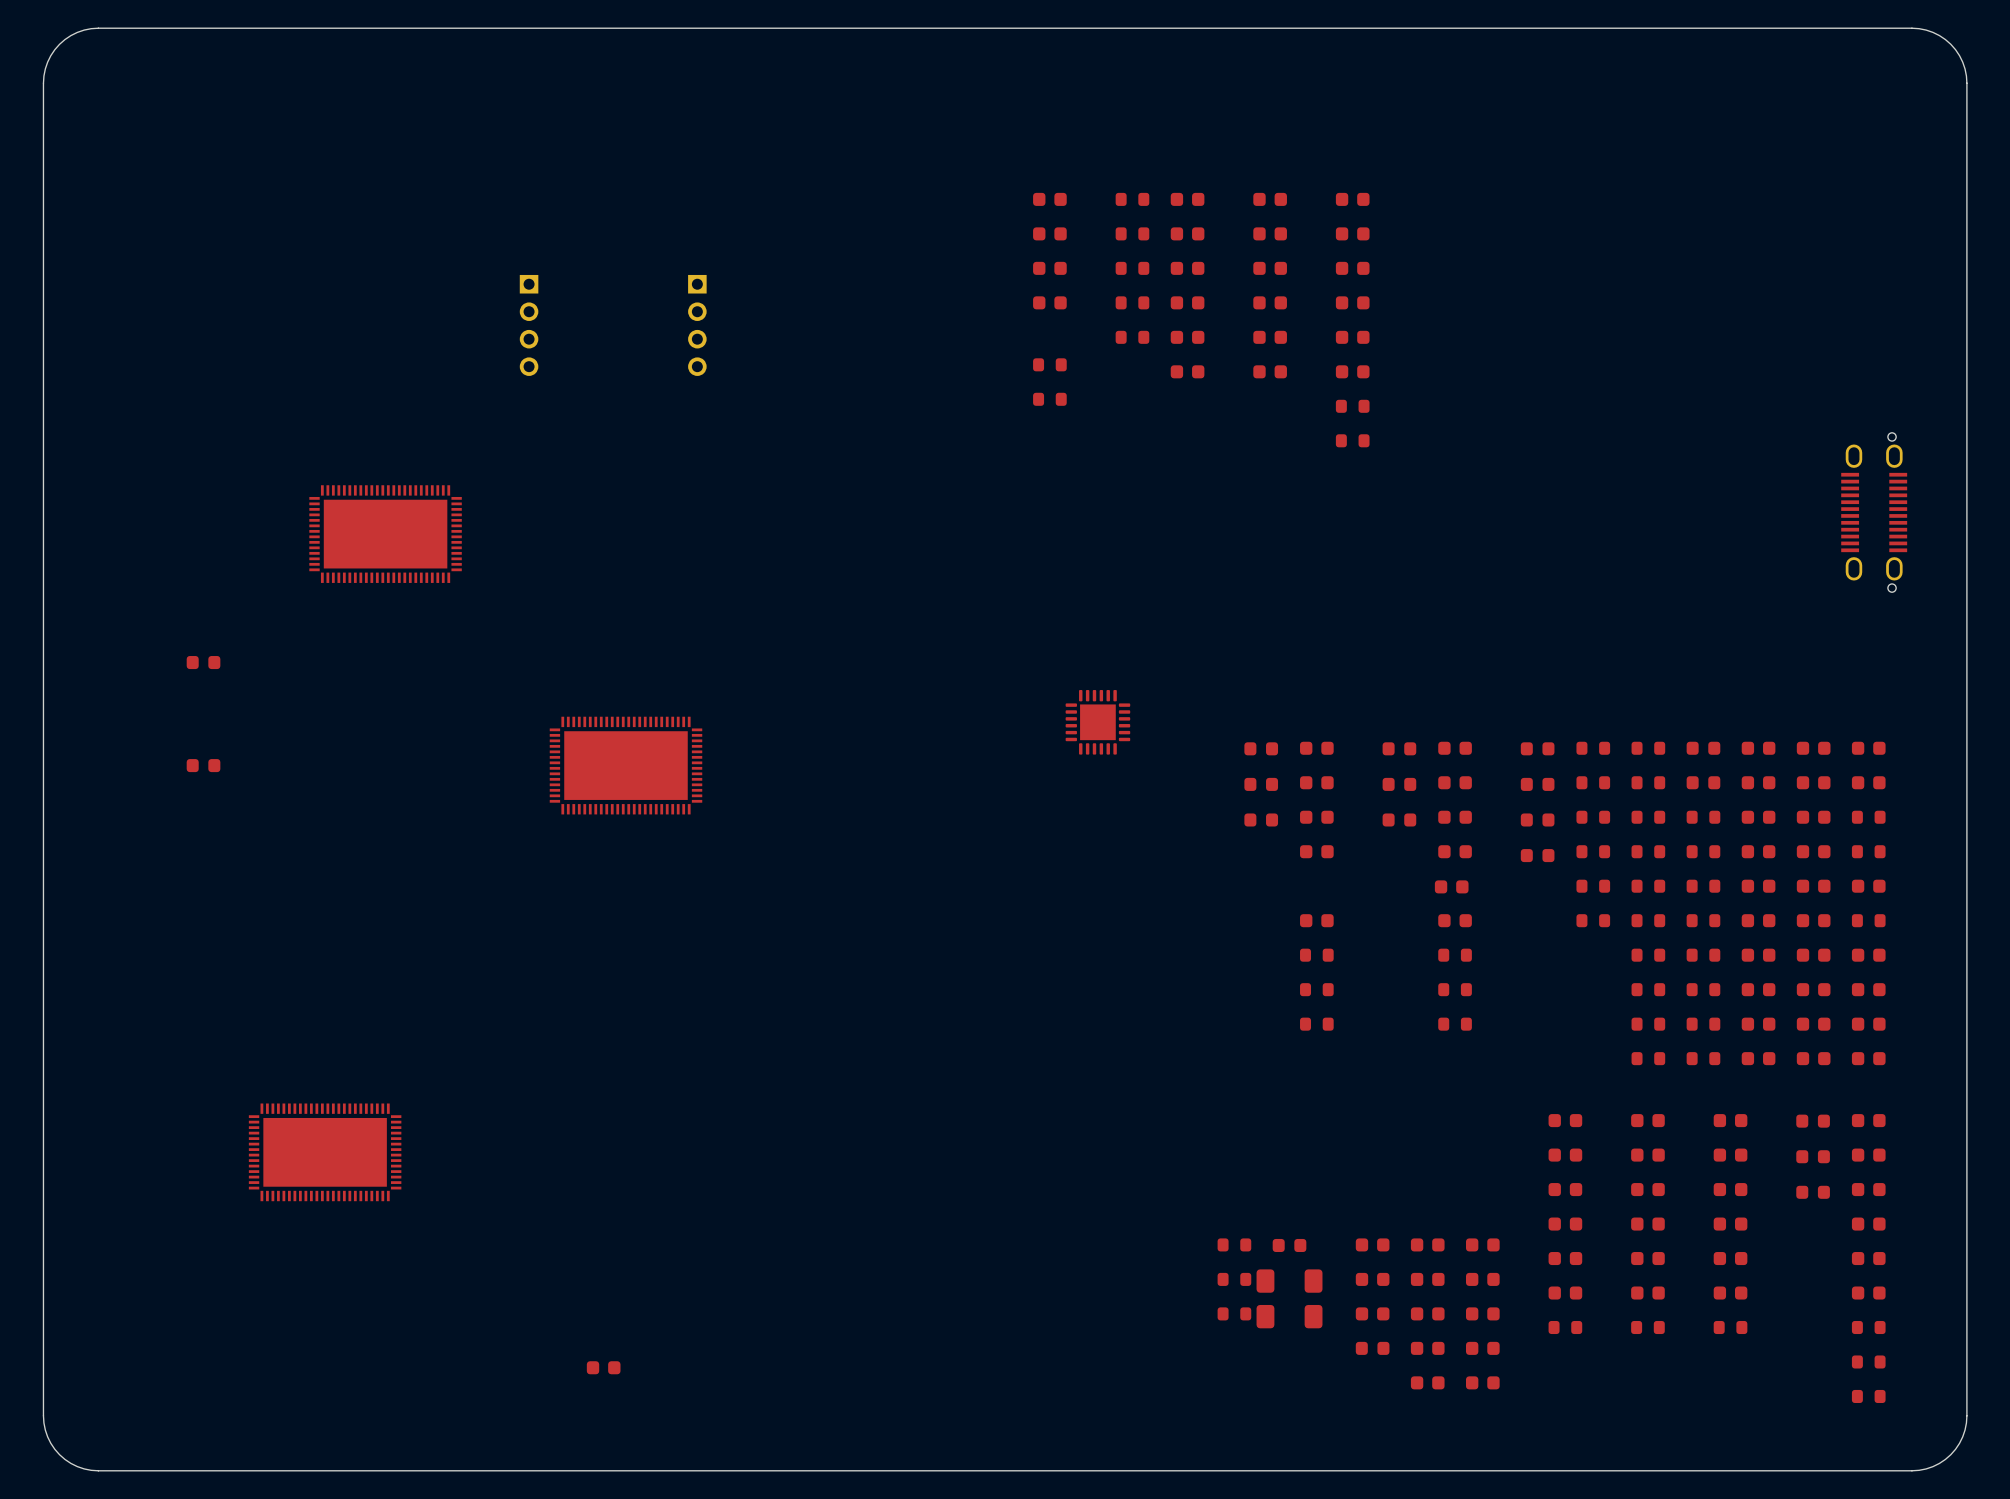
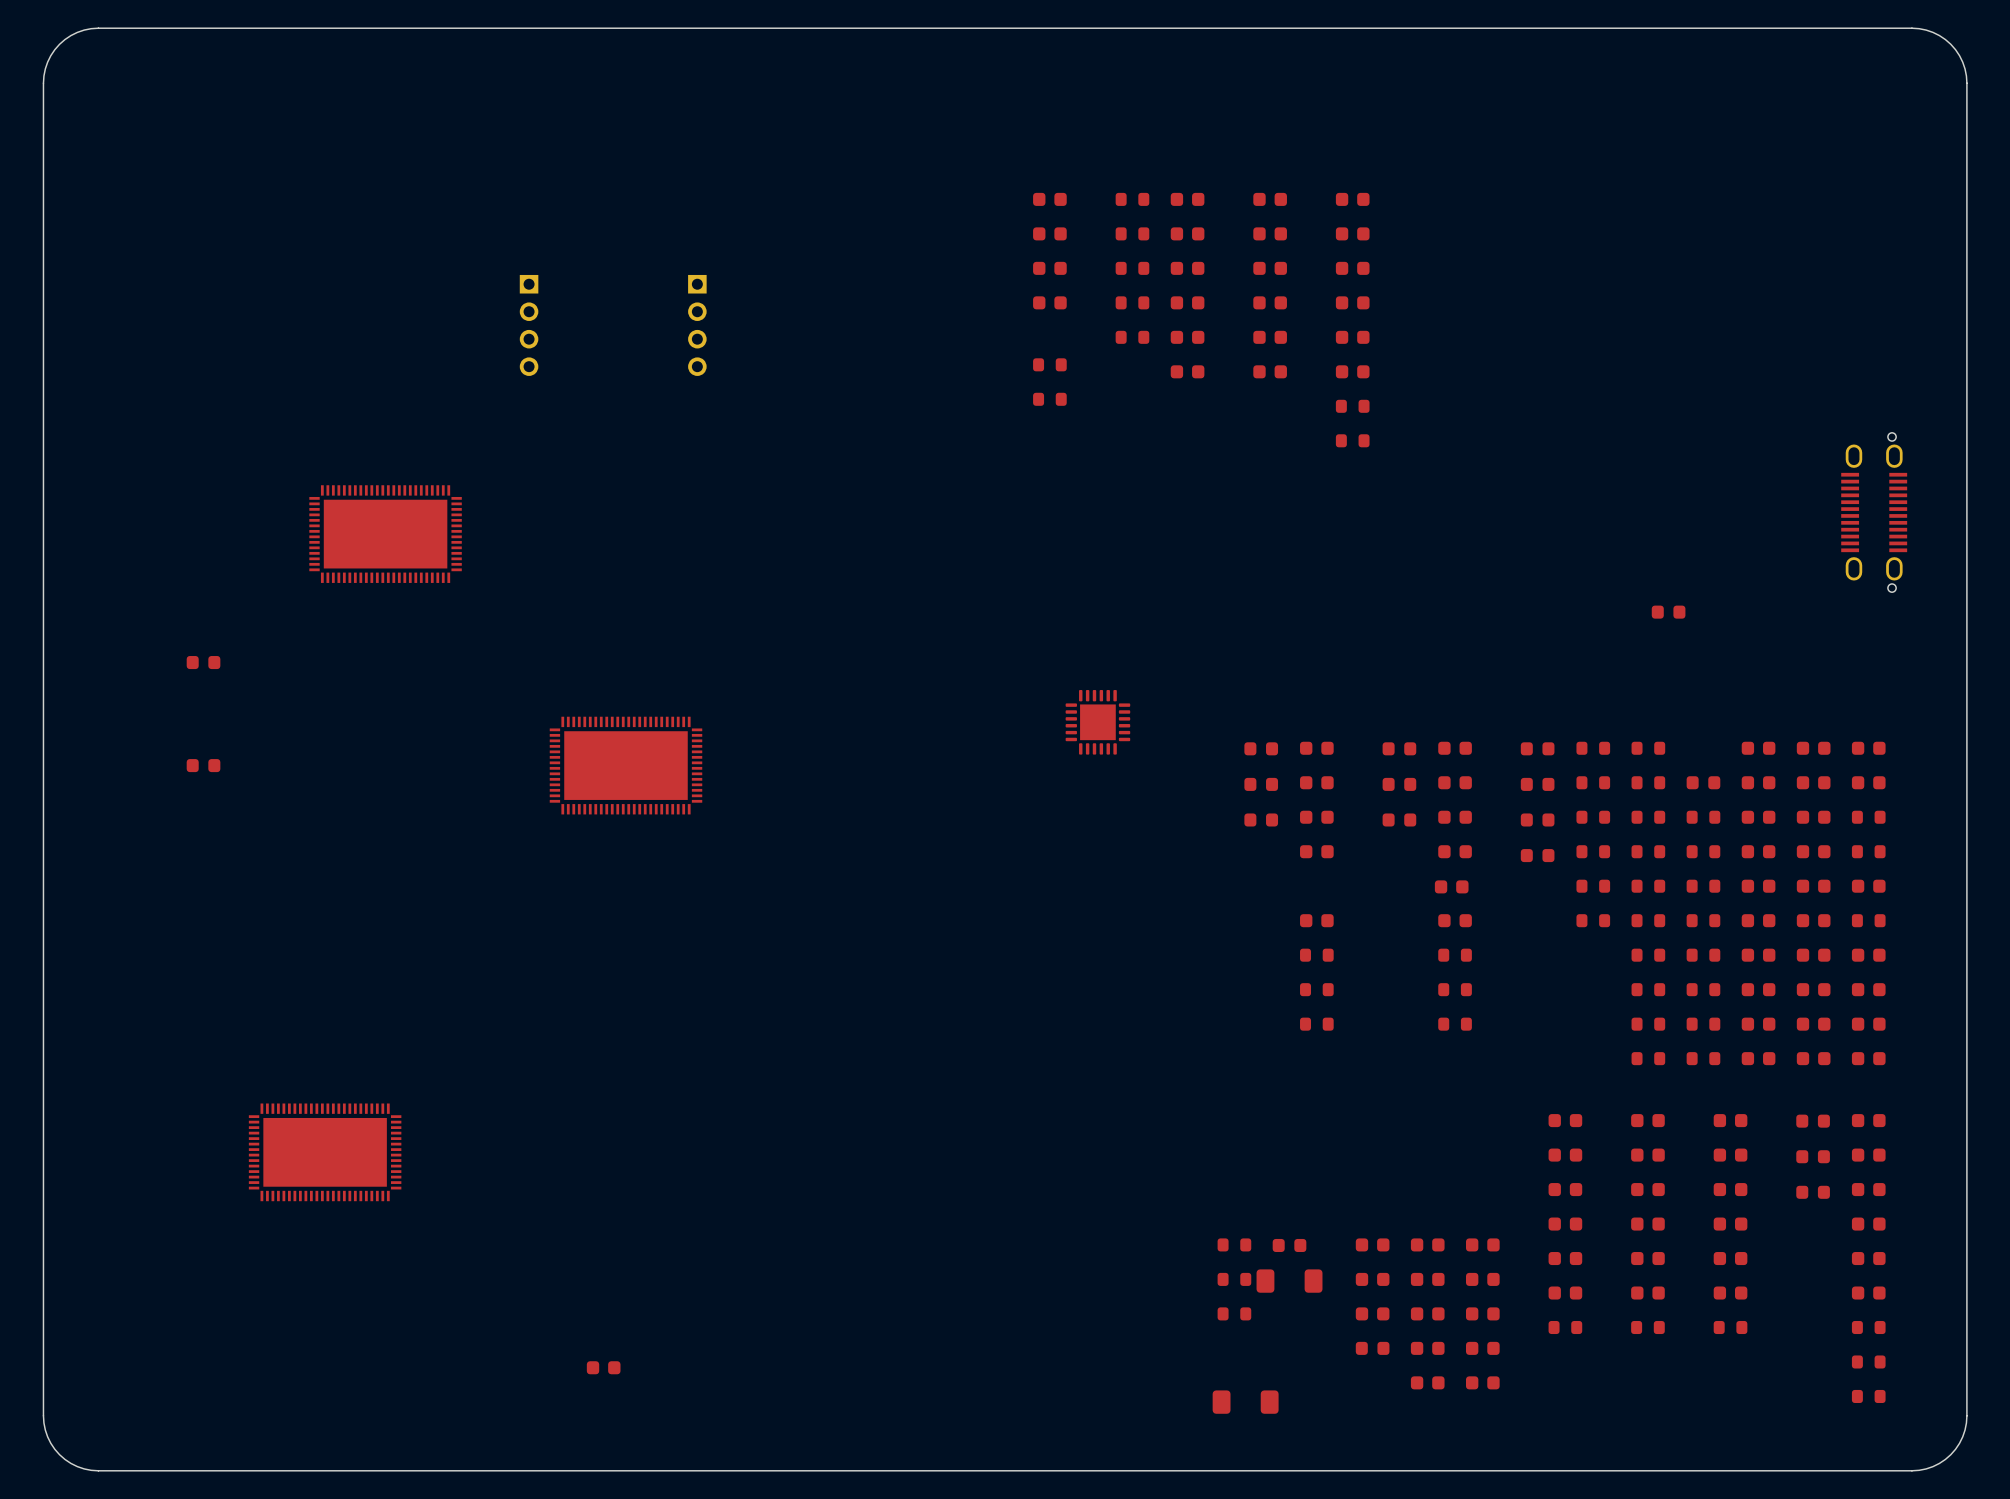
part position: (1703, 748) -> (1668, 612)
part position: (1289, 1316) -> (1245, 1402)

